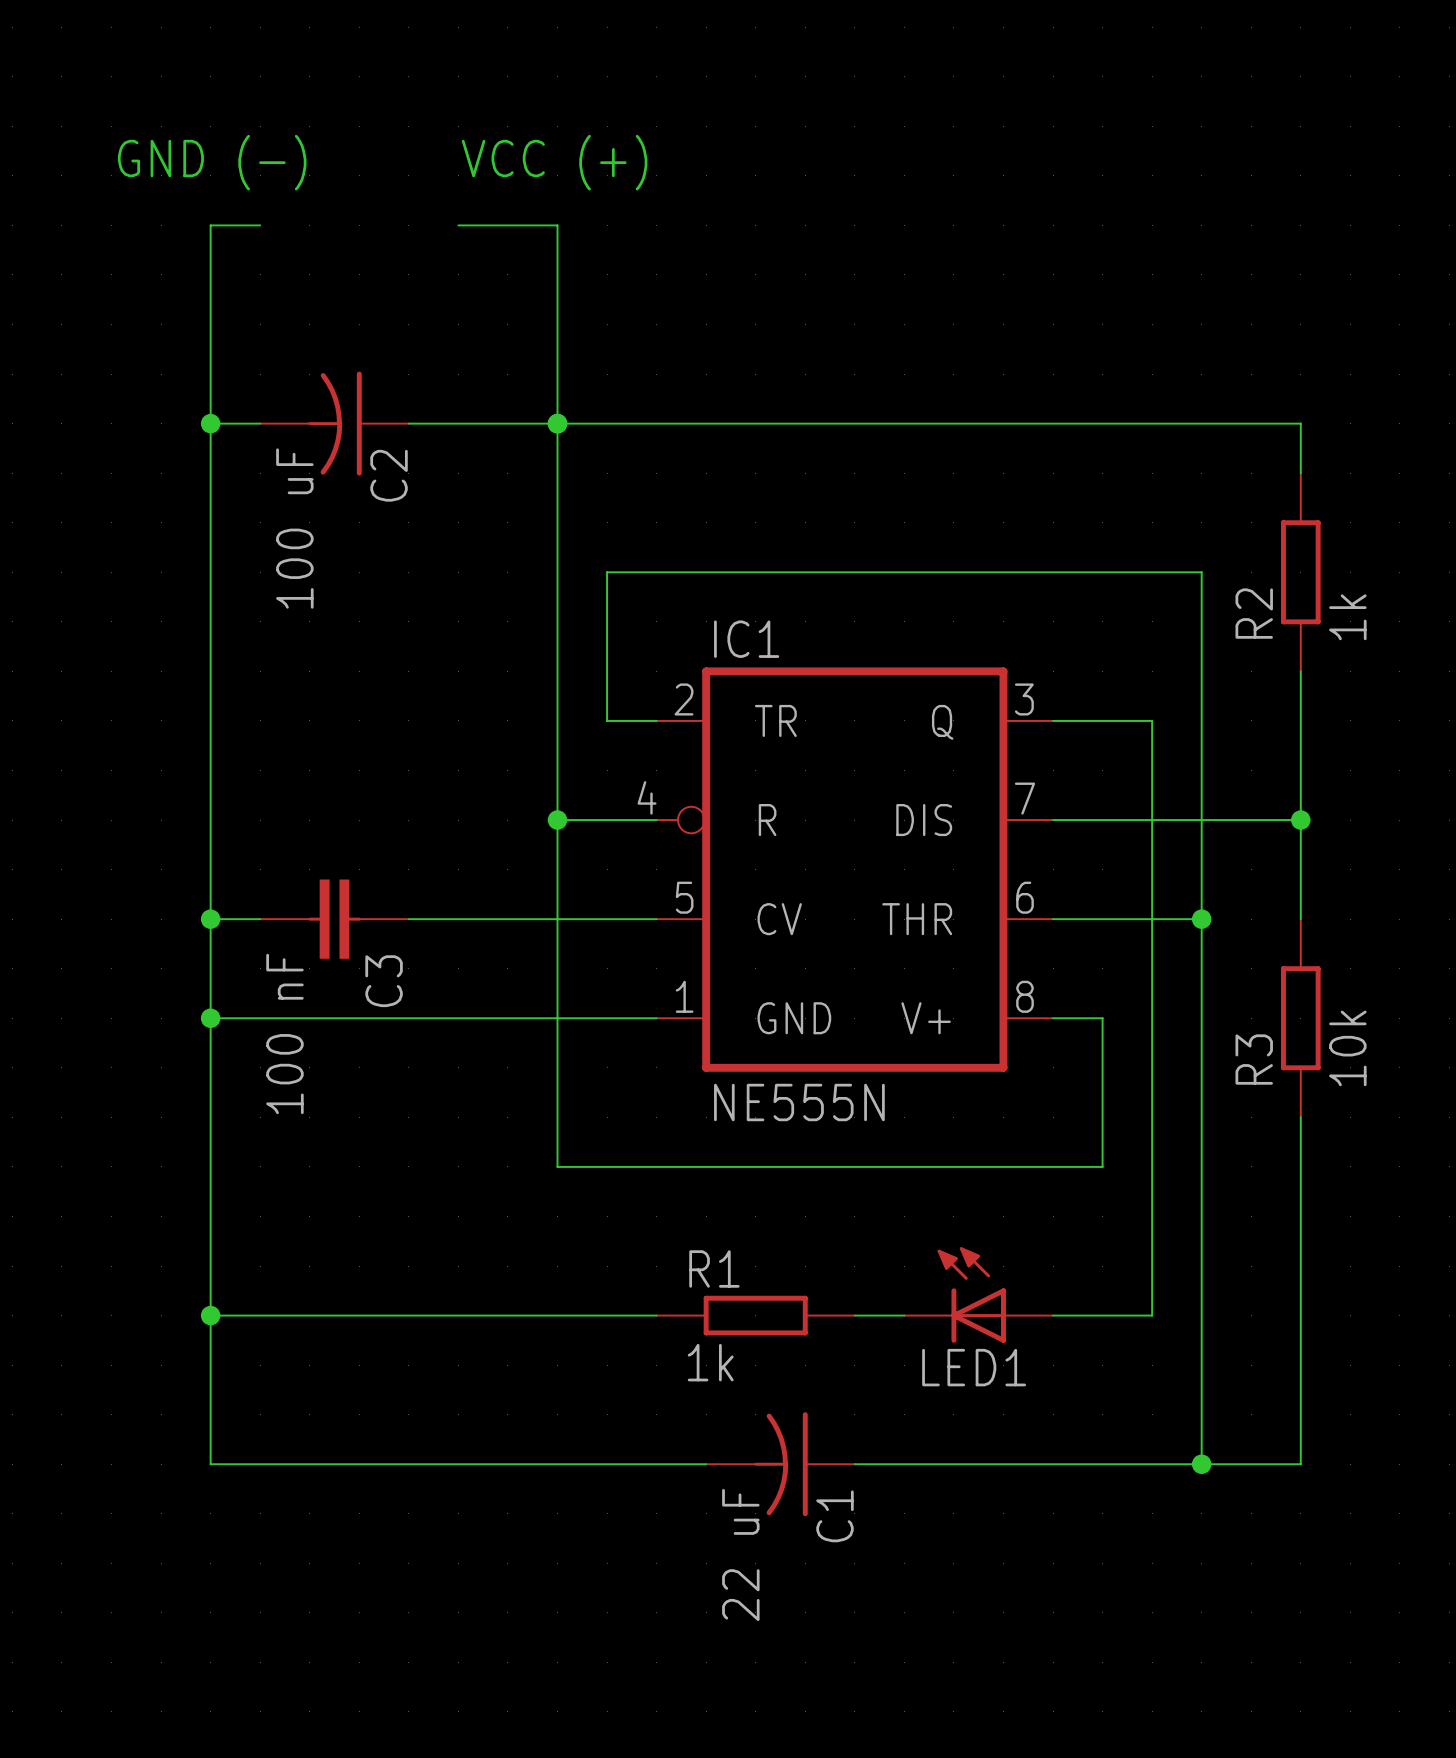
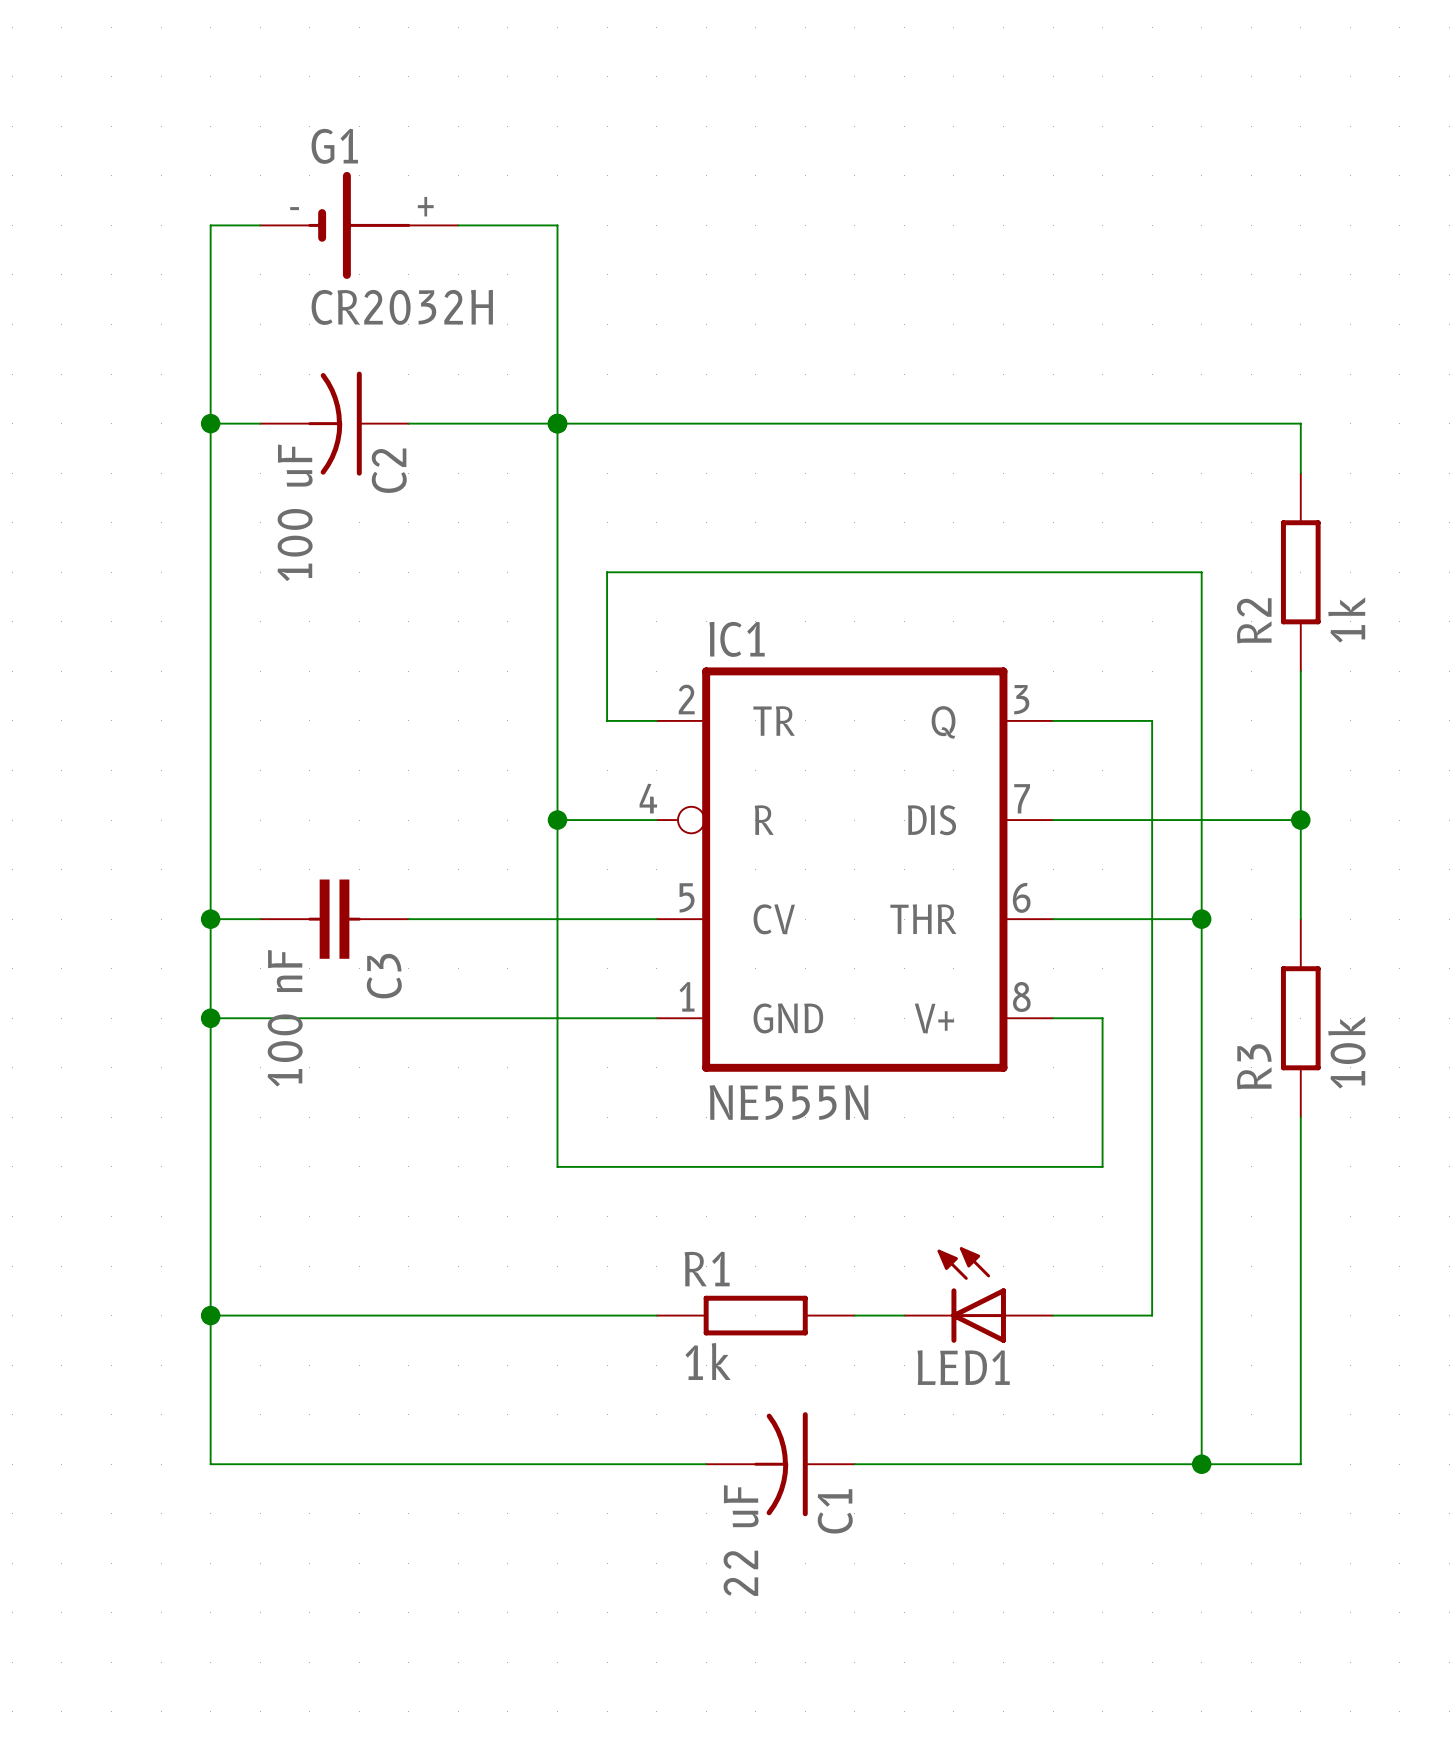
text: GND (-) (212, 162) -> none
text: VCC (+) (554, 162) -> none
G1: none -> CR2032H (359, 225)

